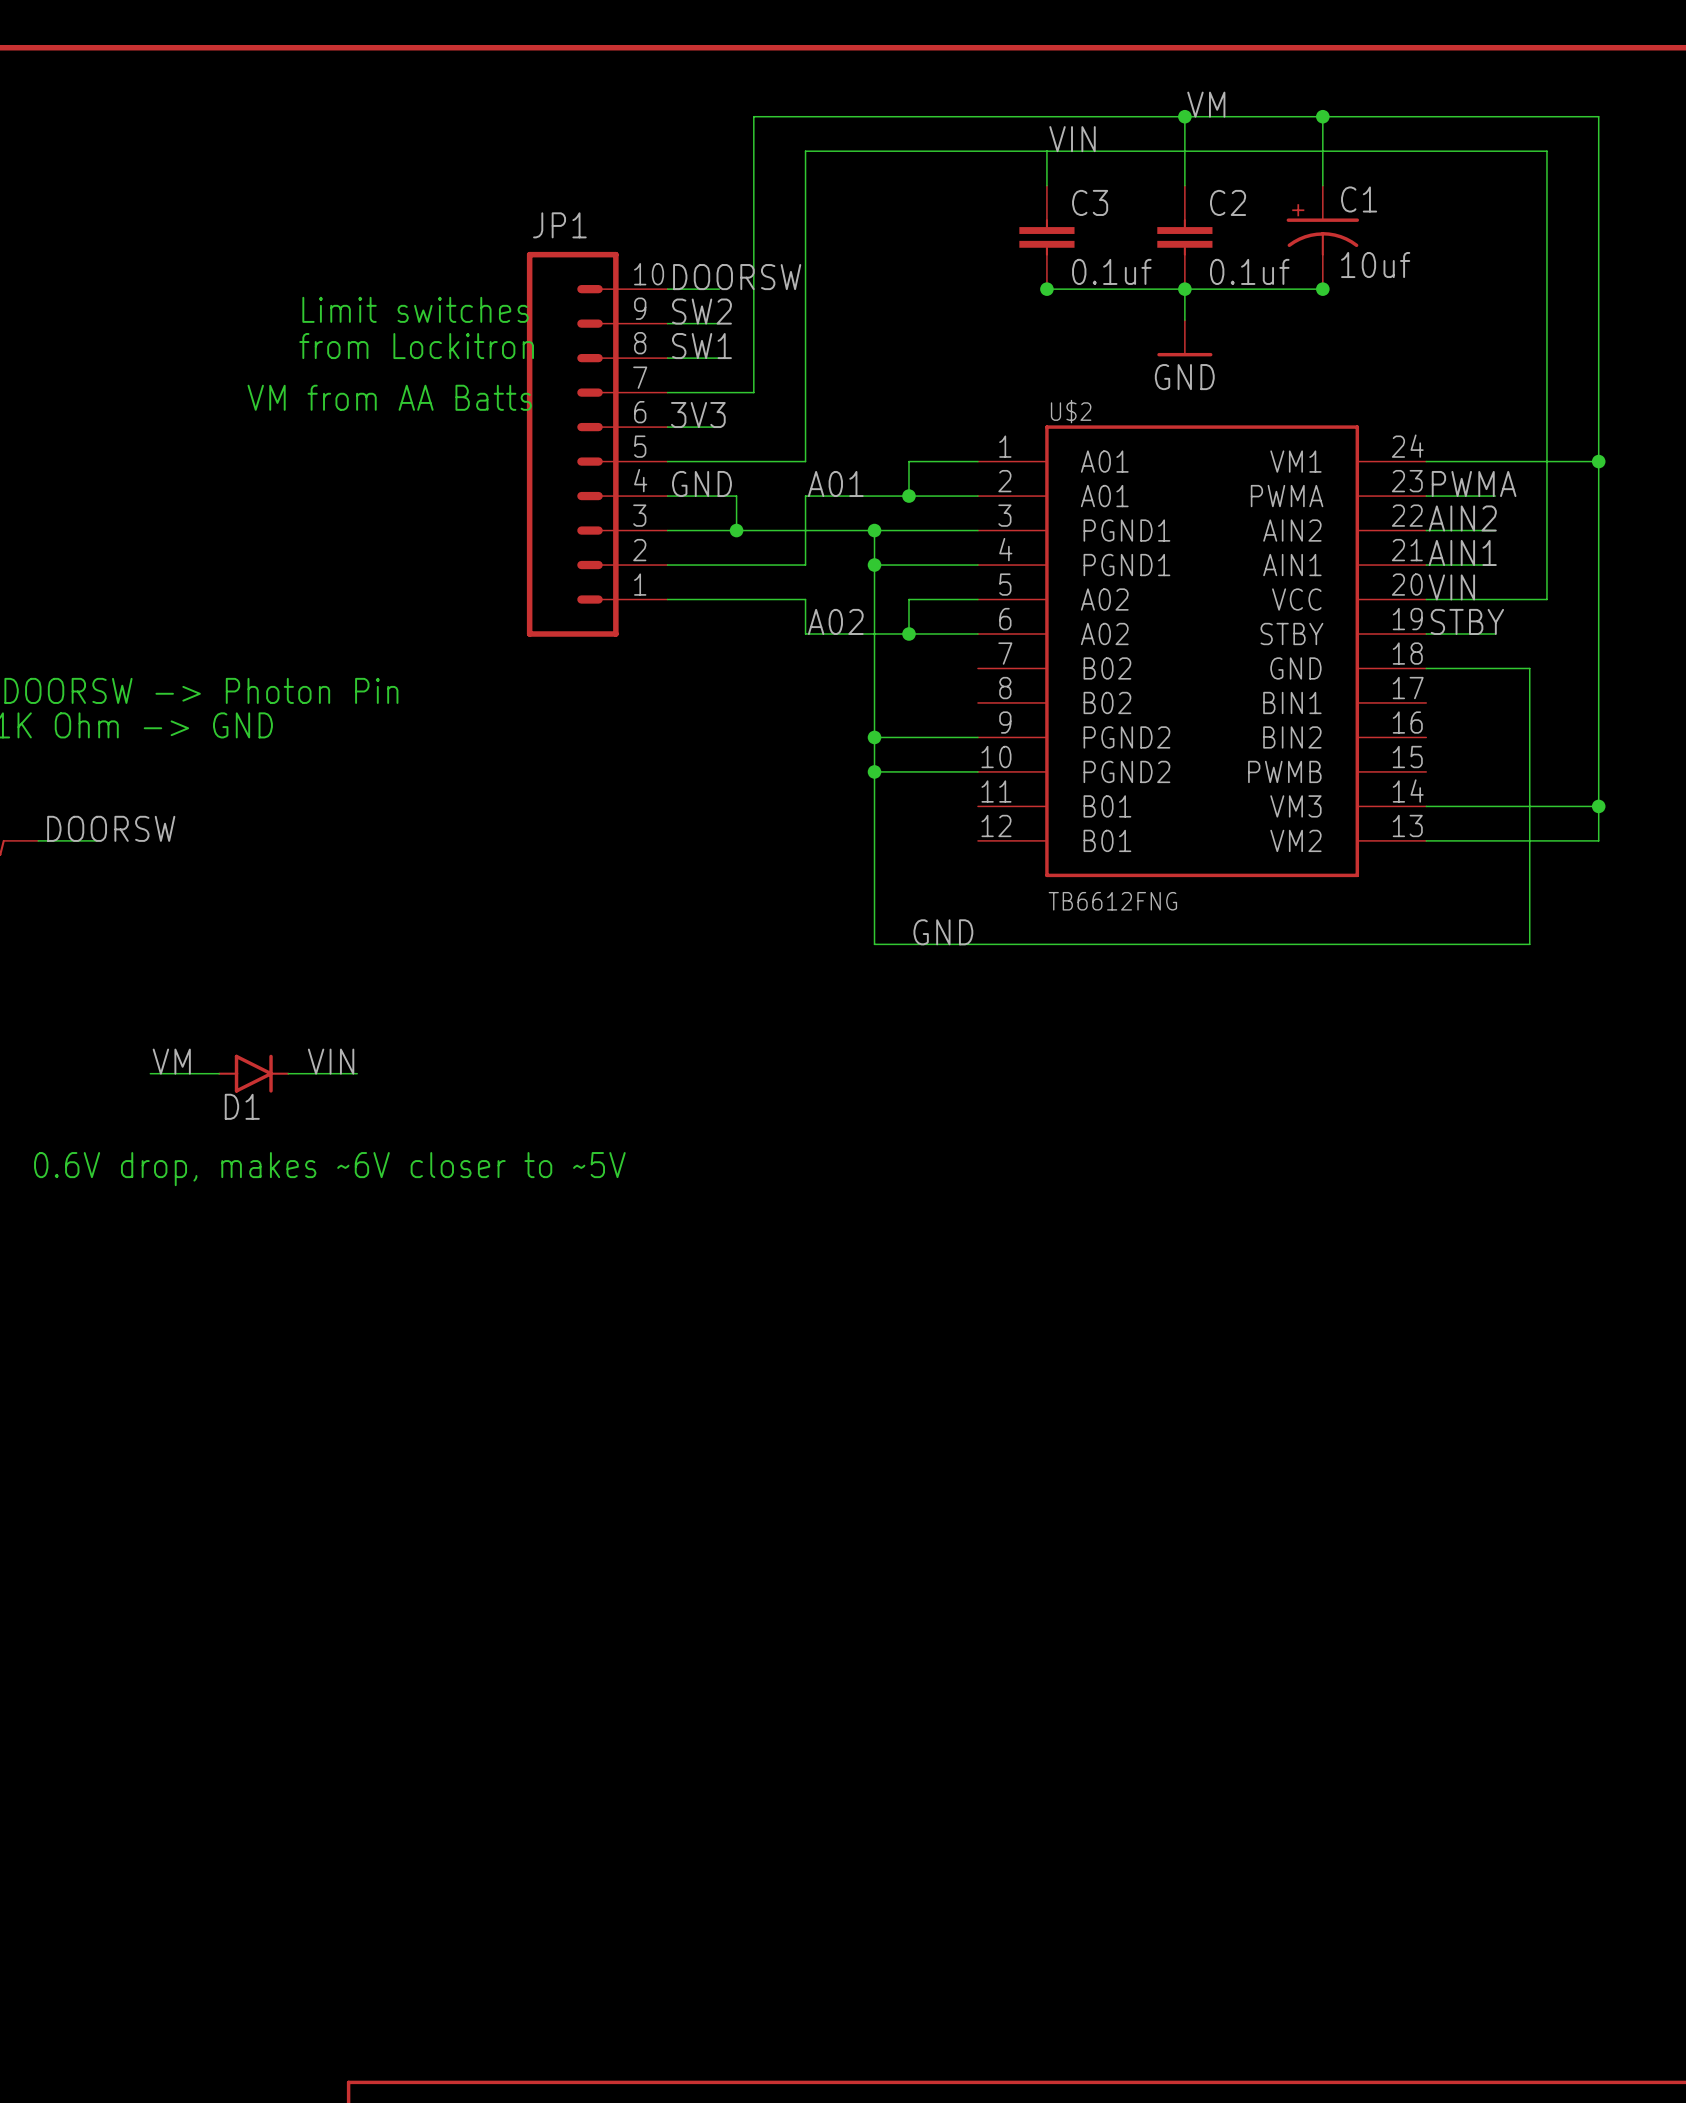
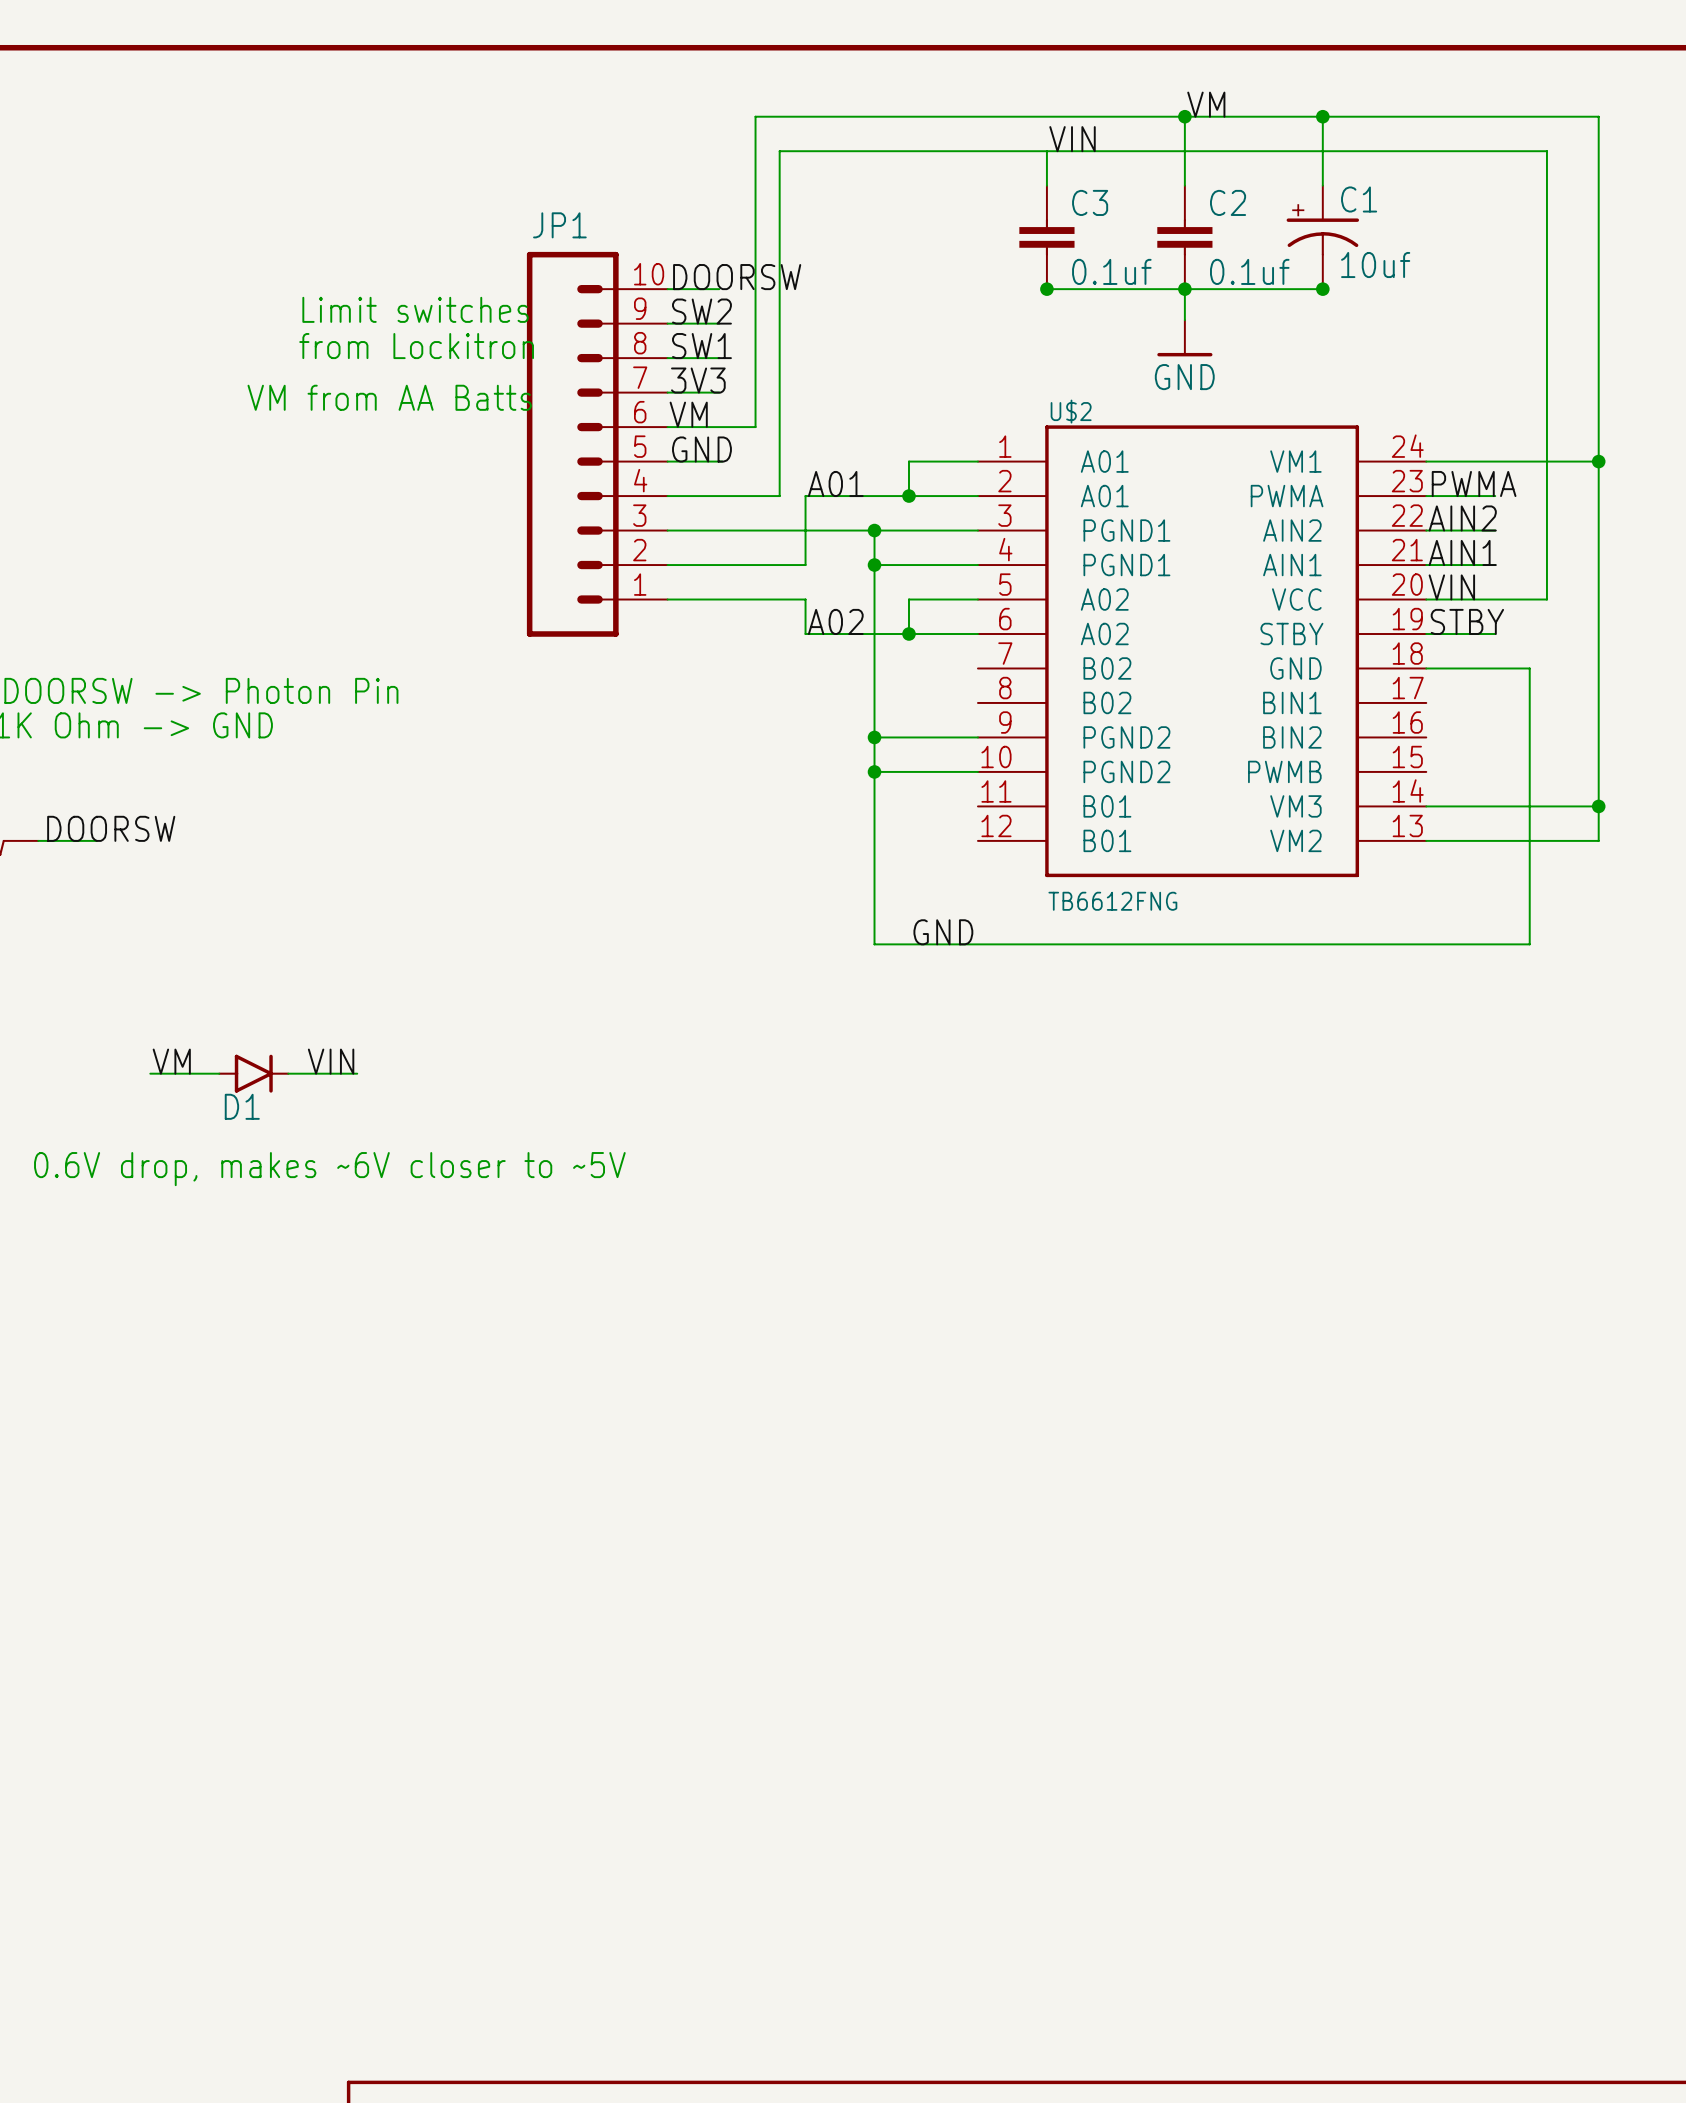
wire: (755, 116) (753, 116) (753, 392) (719, 392) -> (755, 116) (755, 427) (719, 427)
wire: (805, 151) (805, 461) (722, 461) -> (805, 151) (779, 151) (779, 496) (736, 496)
label: none -> 3V3 (698, 380)
label: 3V3 (698, 415) -> VM (688, 414)
label position: GND (701, 483) -> GND (701, 449)
wire: (736, 496) (736, 530) -> none
junction: (736, 530) -> none

